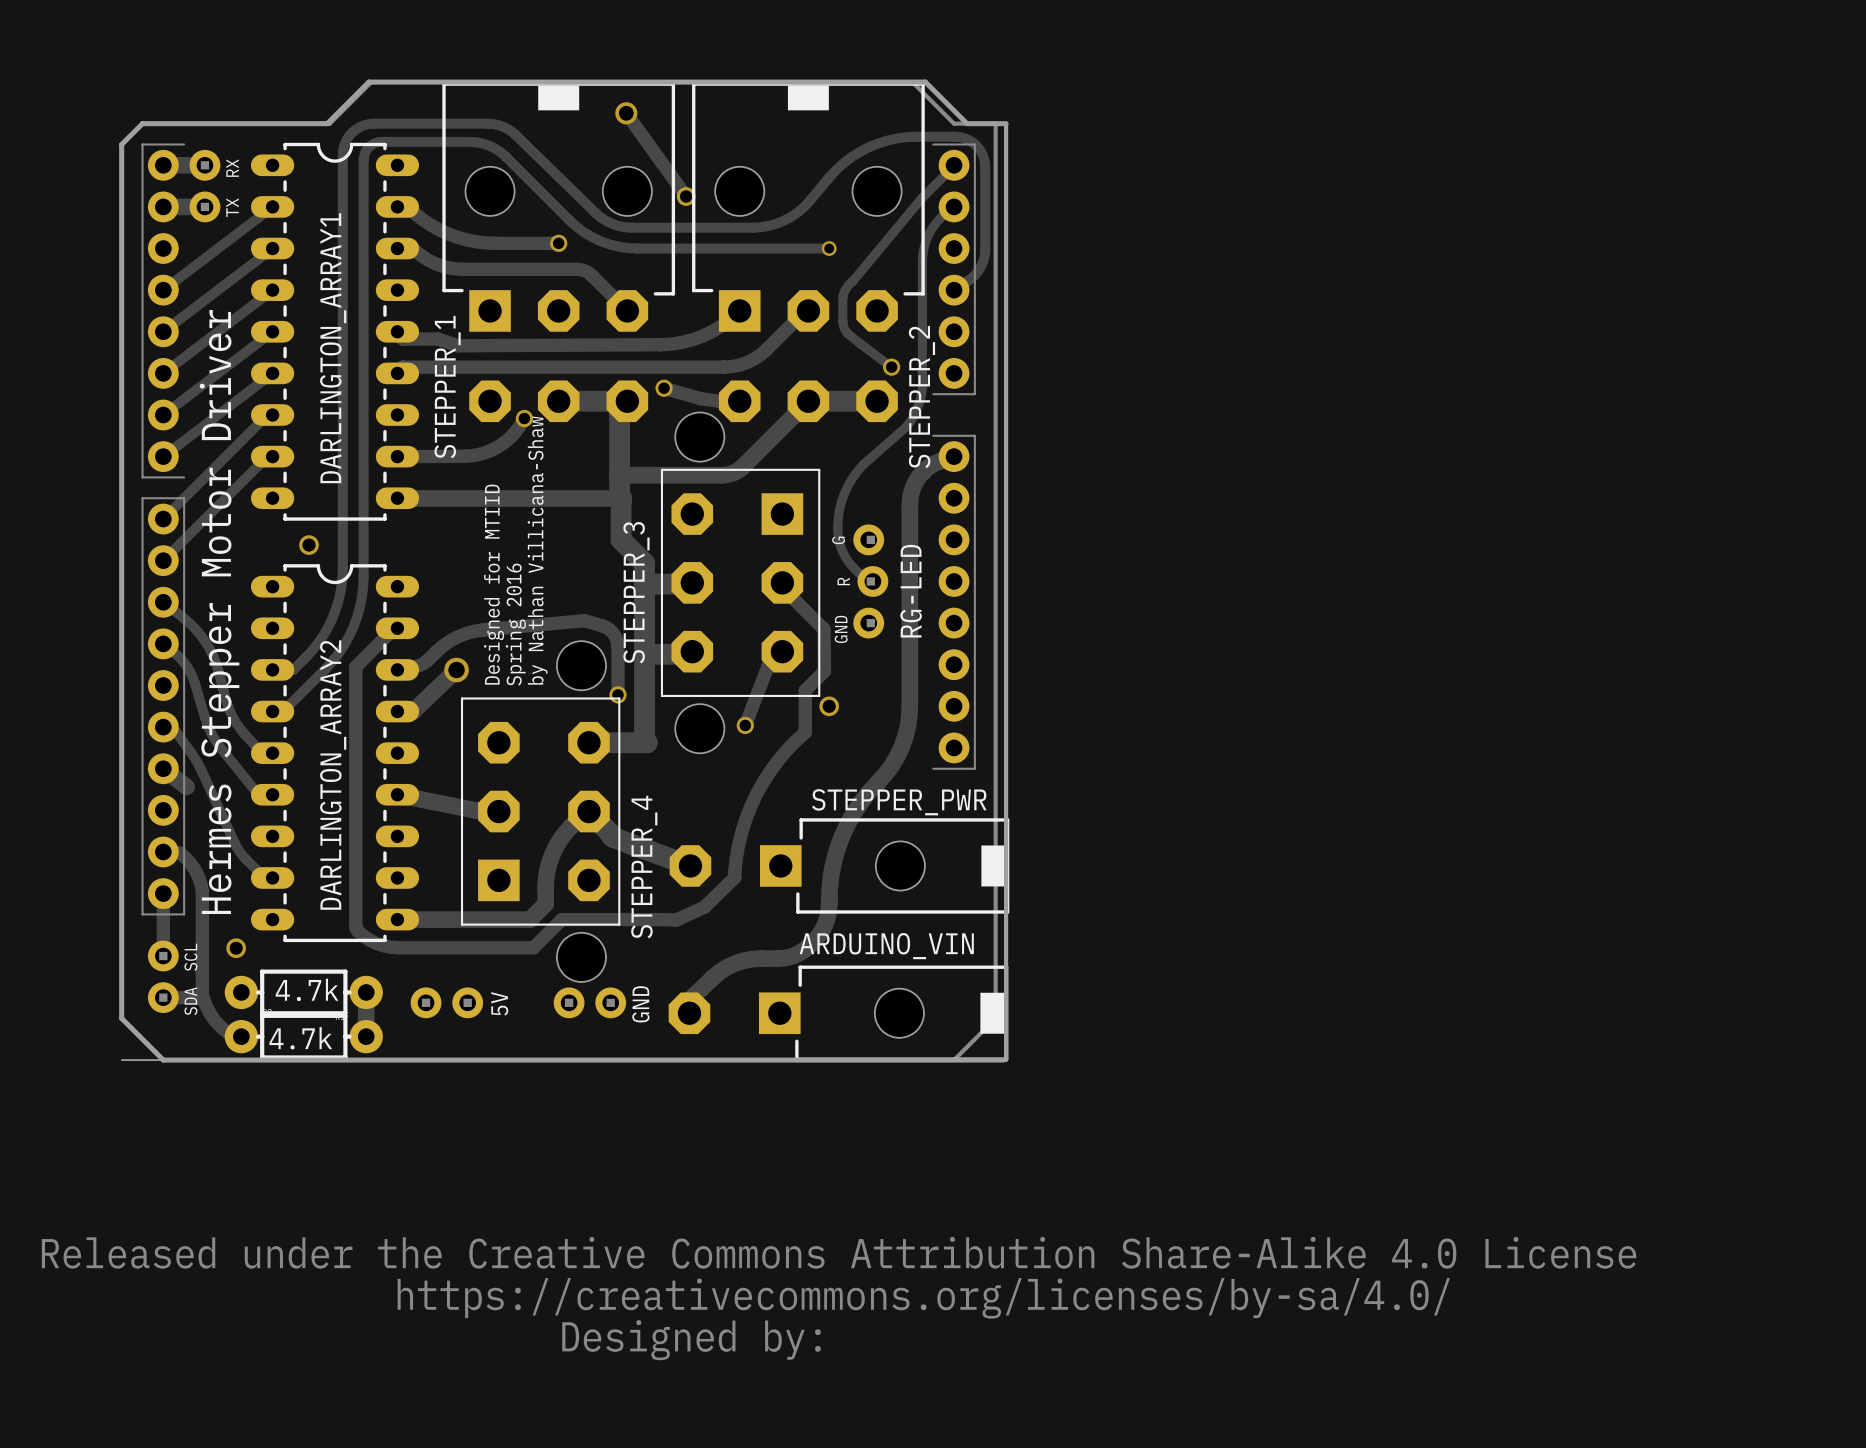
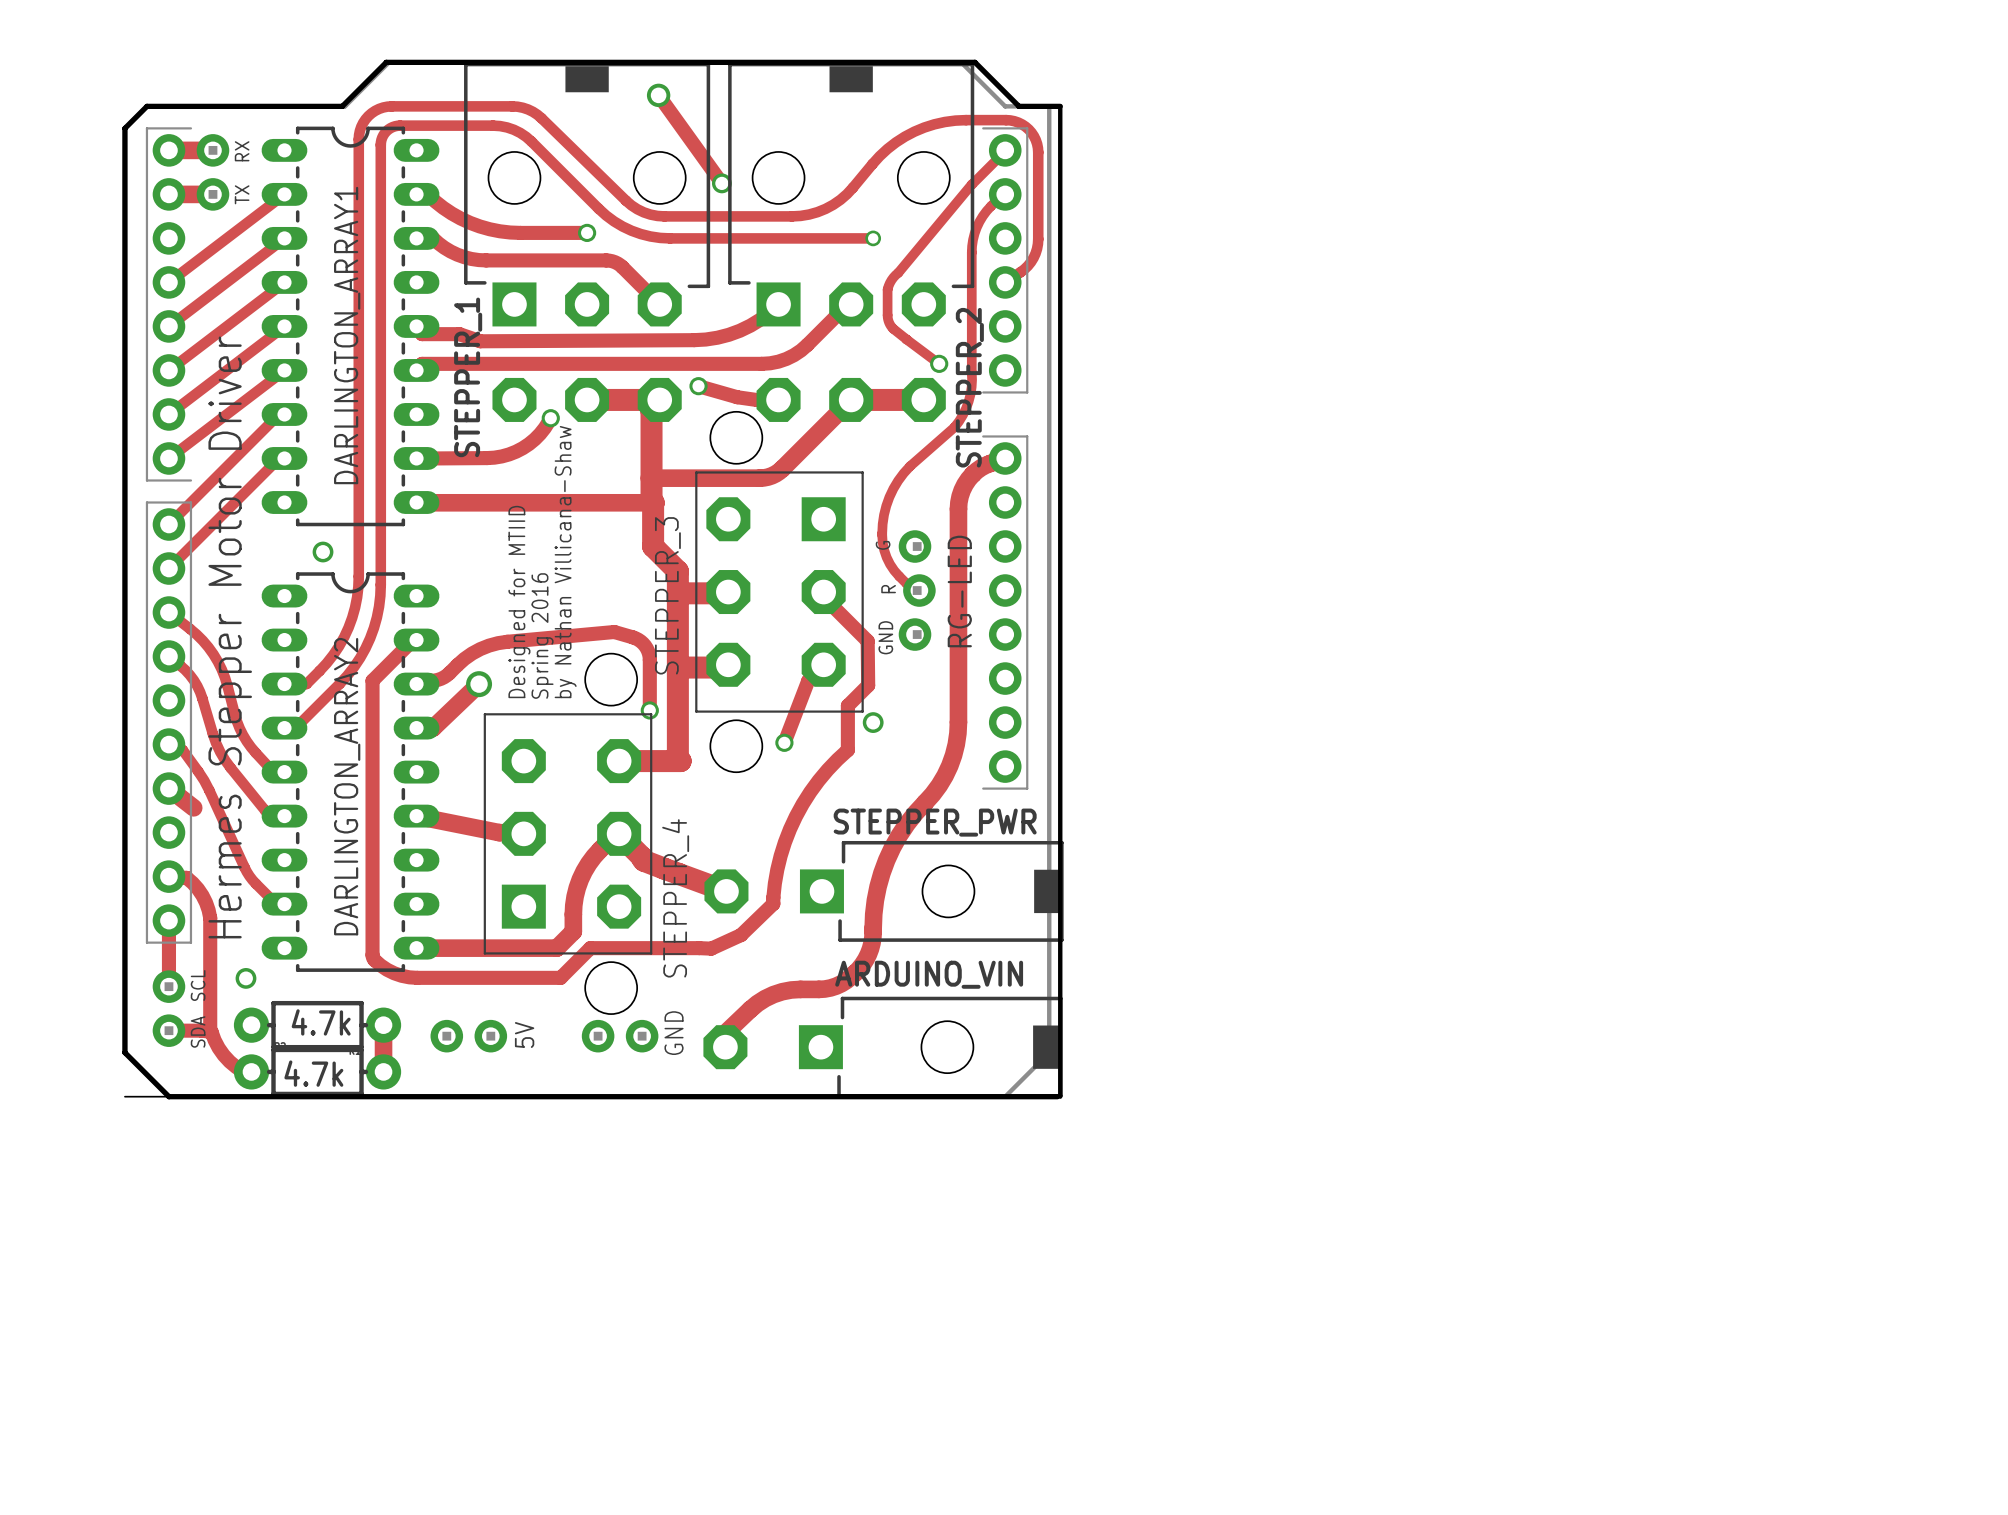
drawing: [41, 1236, 1637, 1361] -> none

